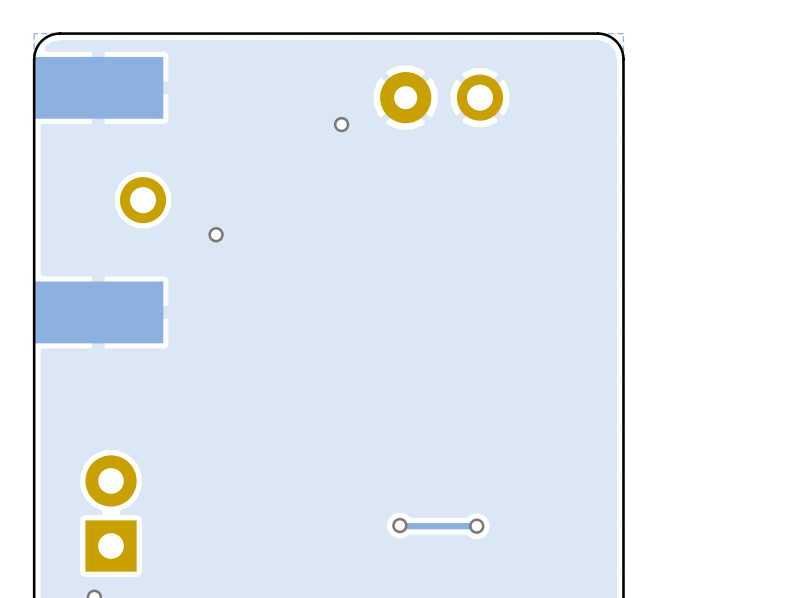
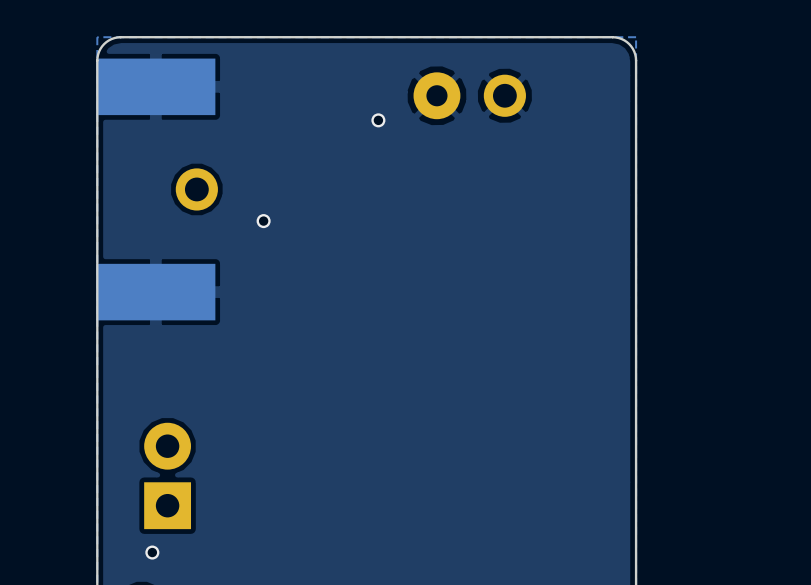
track: (399, 525) (476, 526) -> none
via: (399, 525) -> none
via: (476, 526) -> none

